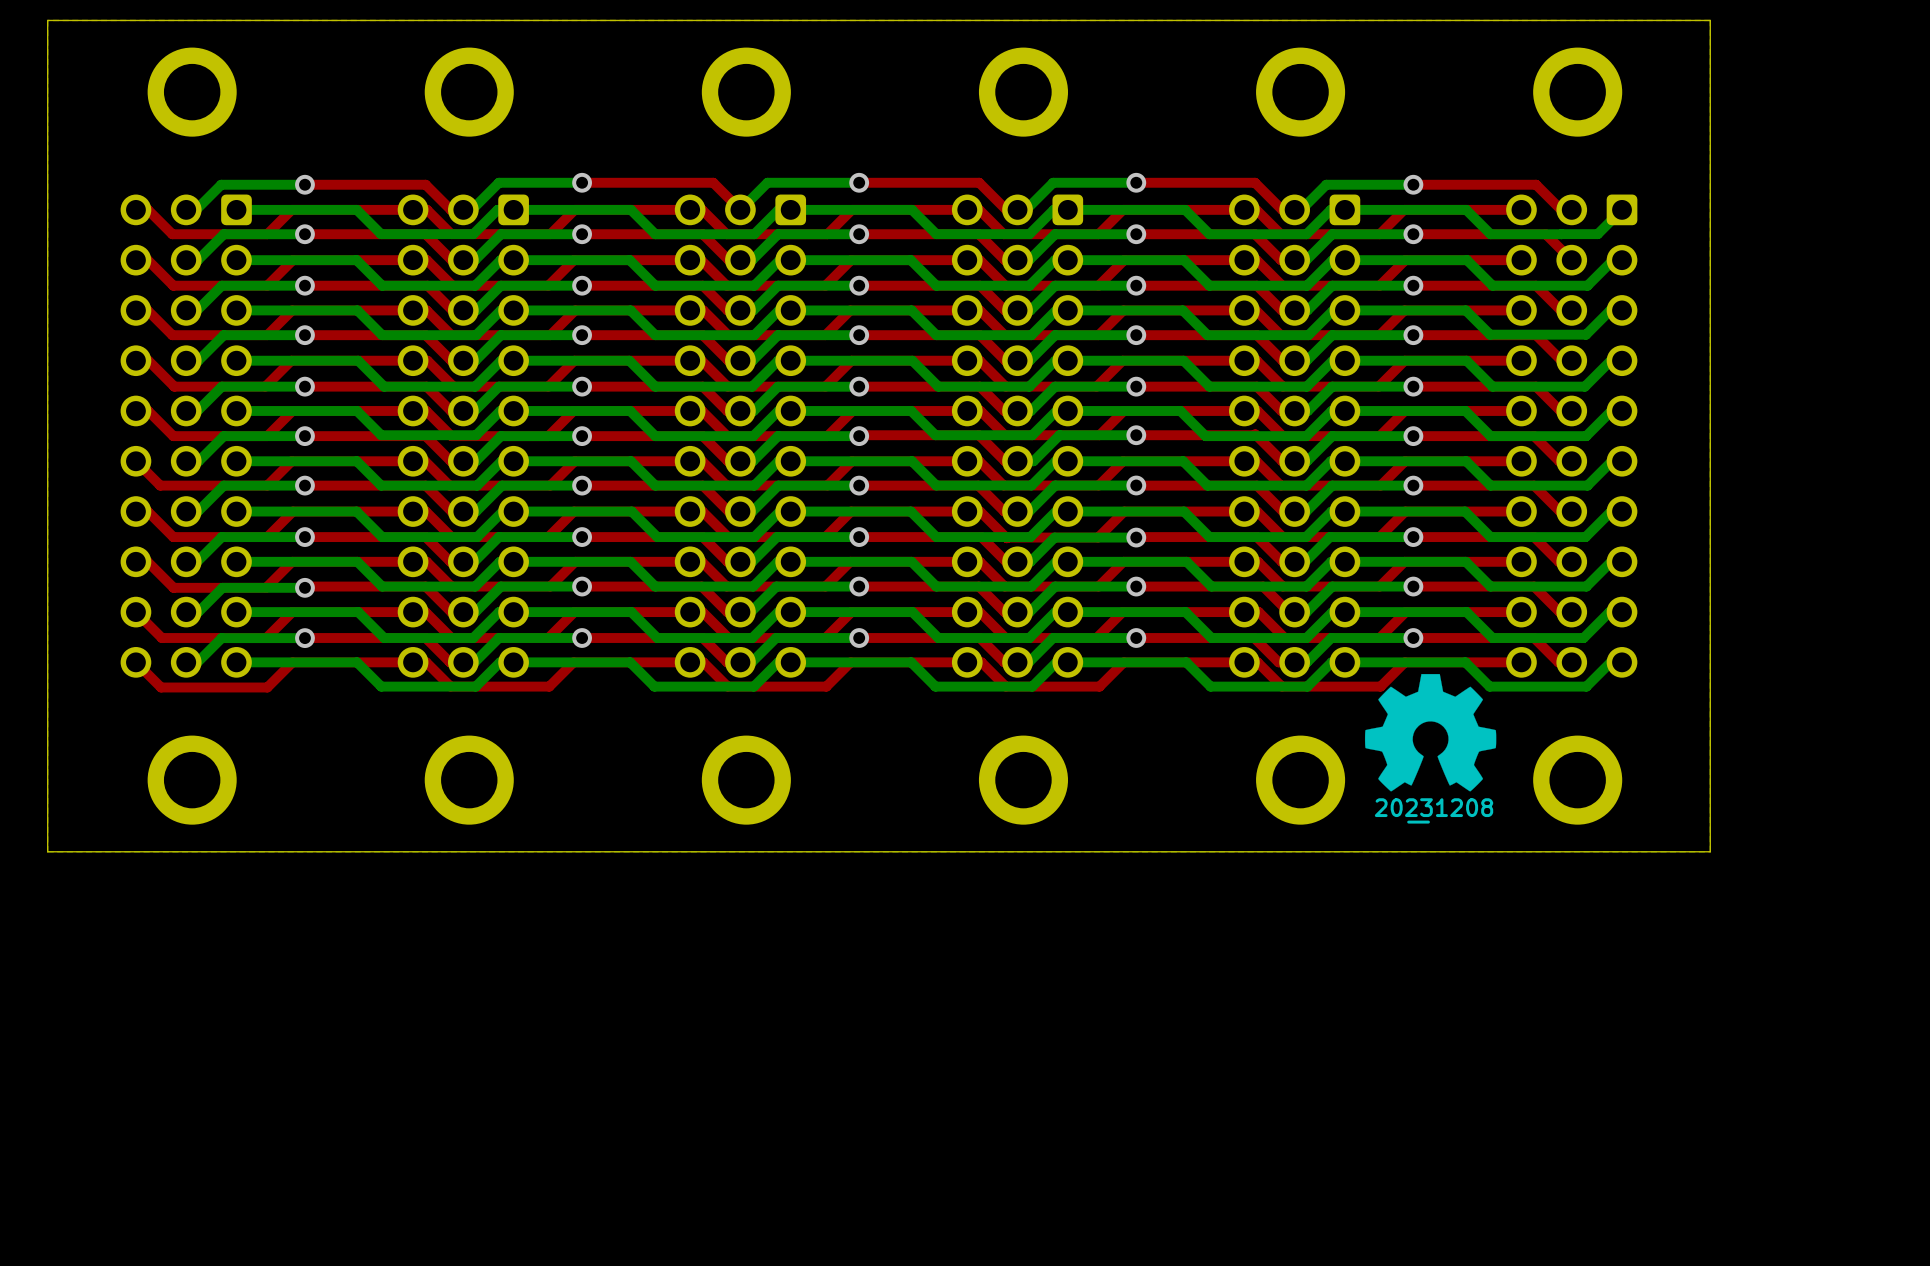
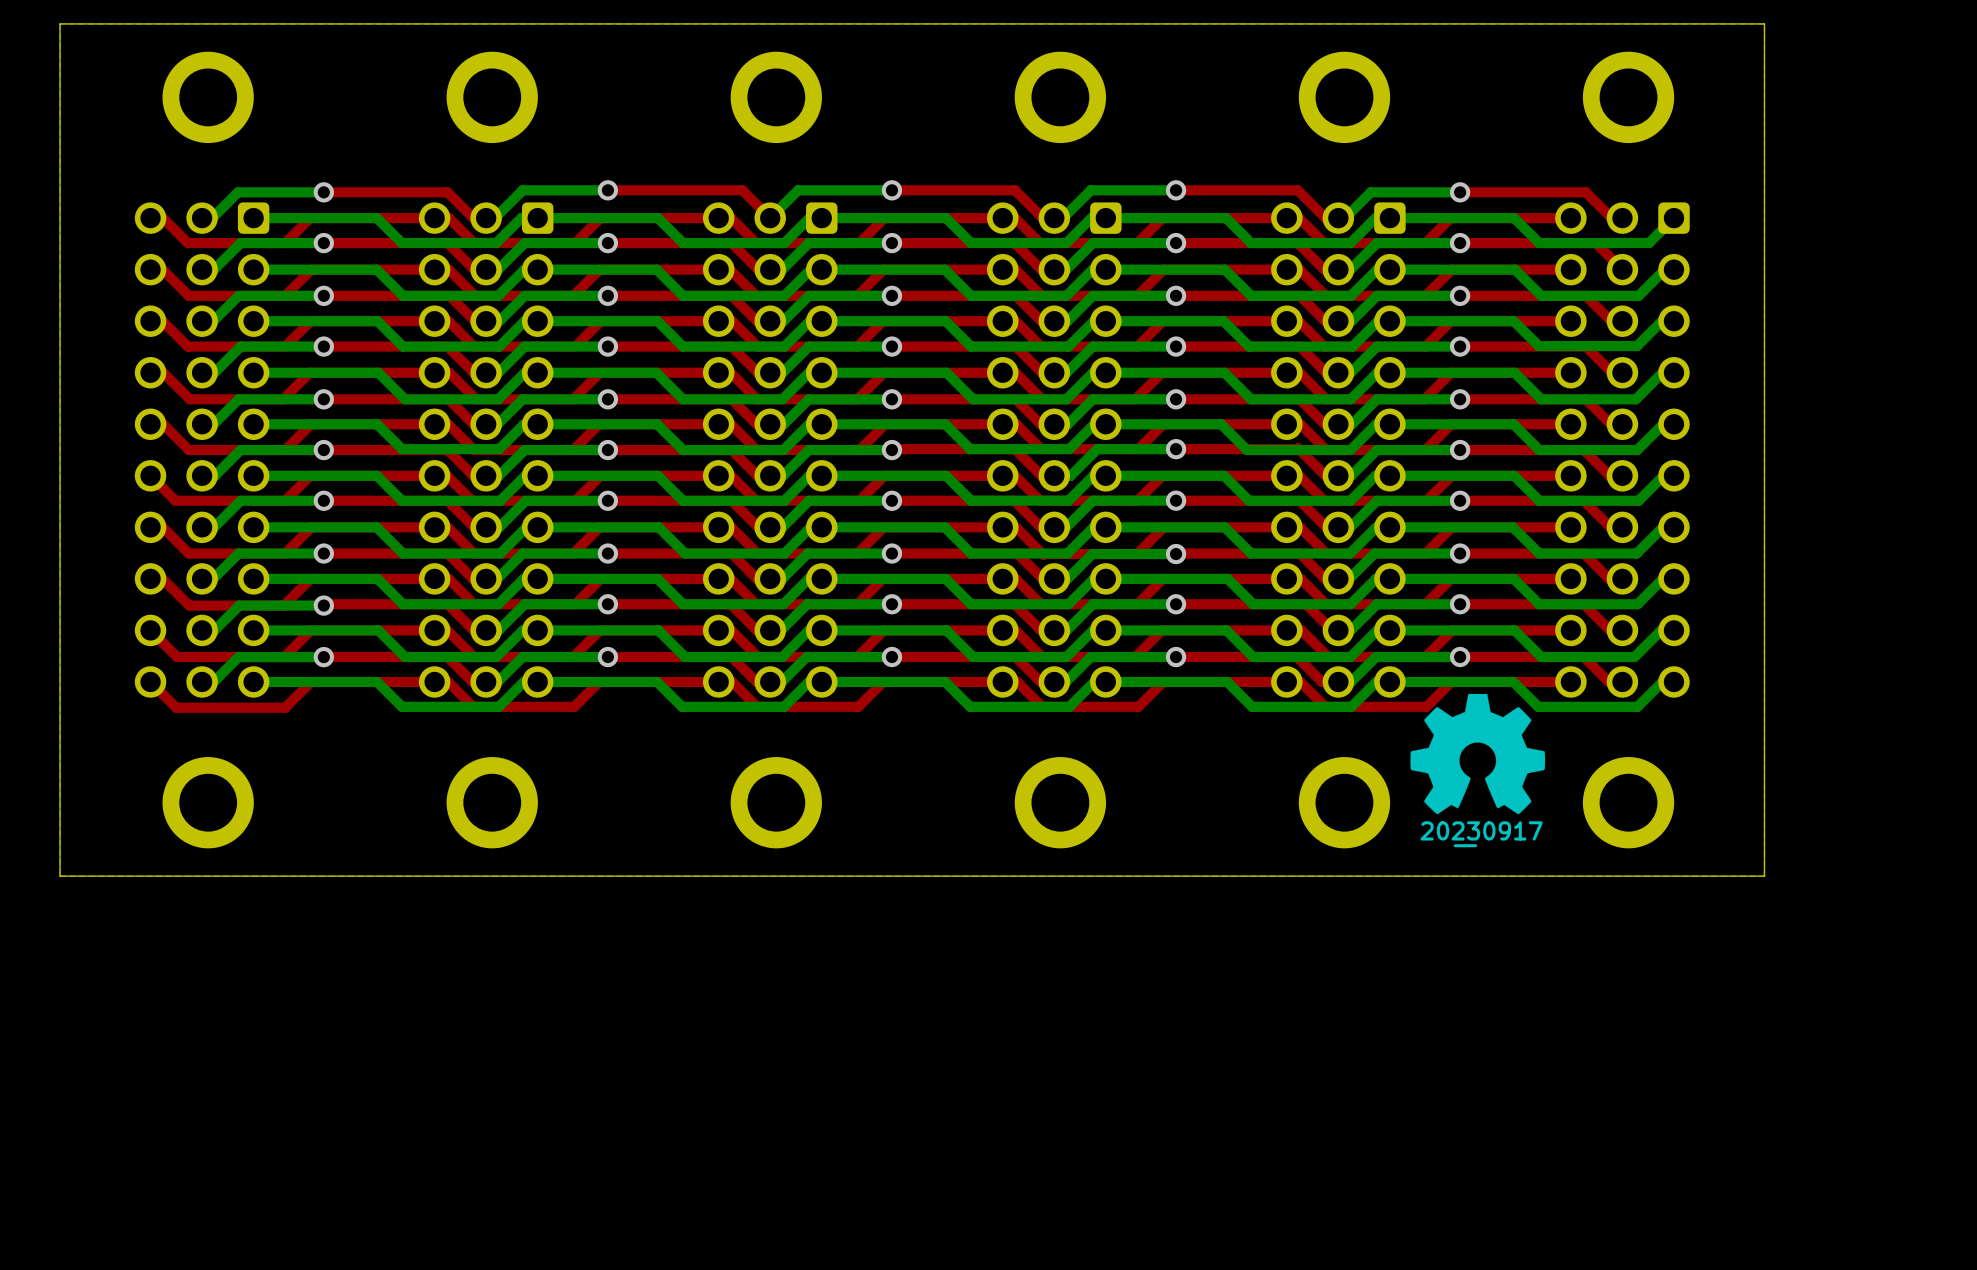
drawing shape: [1374, 798, 1494, 824] -> [1420, 821, 1543, 848]

